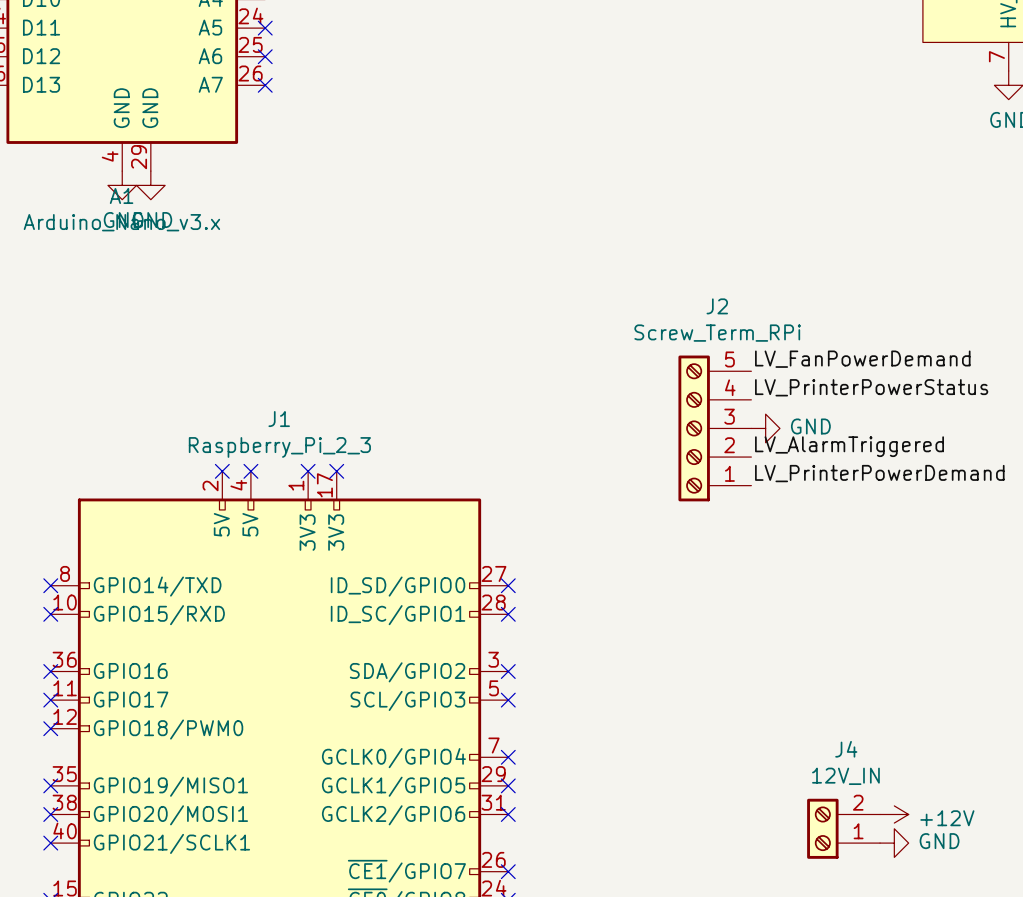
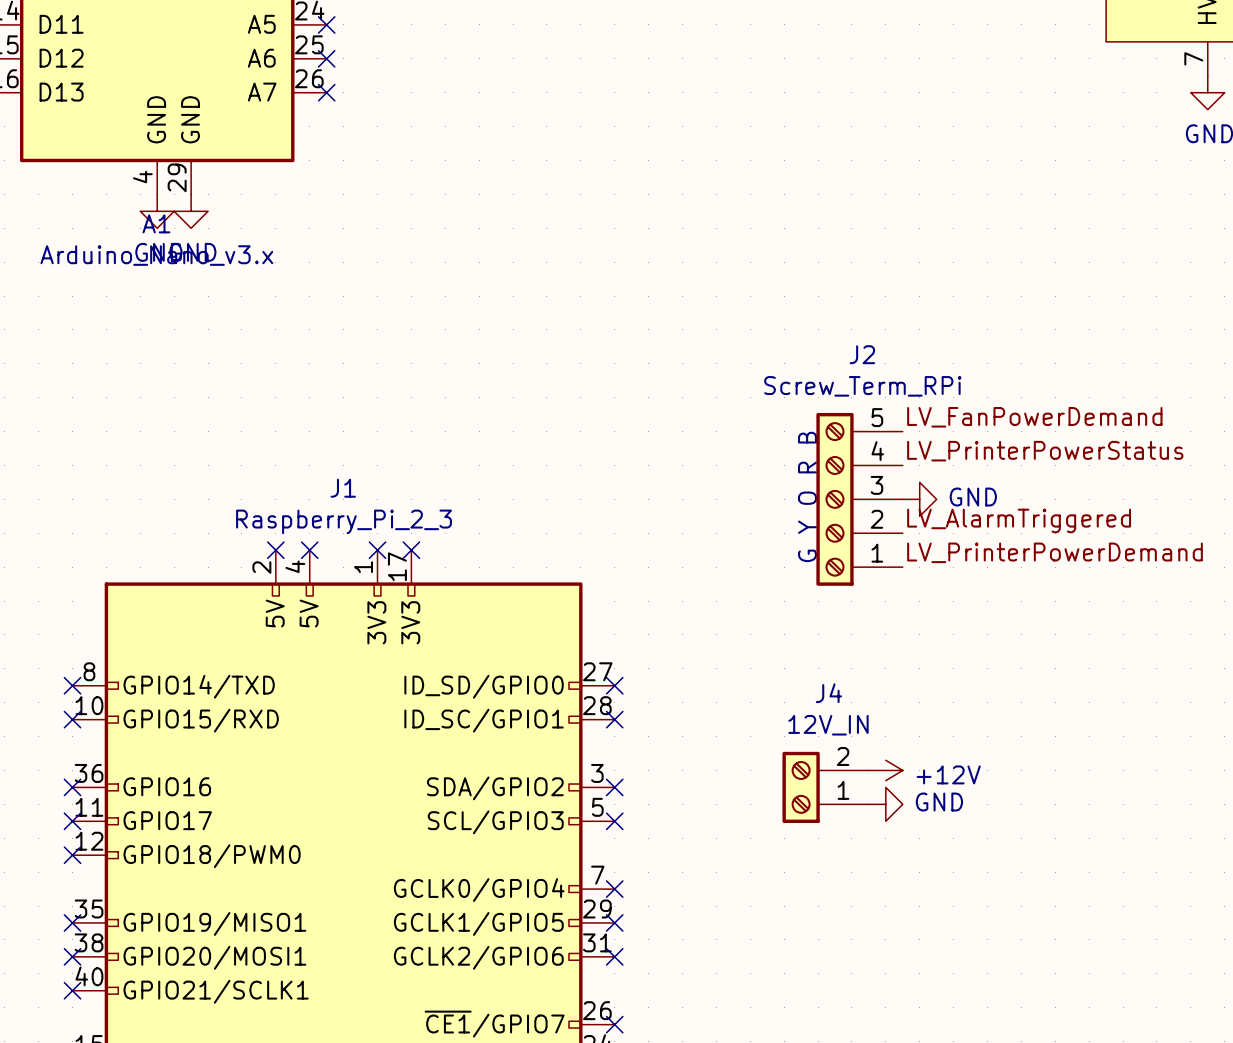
text: none -> G Y O R B (807, 496)
power symbol position: +12V (894, 814) -> +12V (885, 770)
J4 position: (843, 828) -> (825, 787)
power symbol position: GND (894, 843) -> GND (885, 804)

